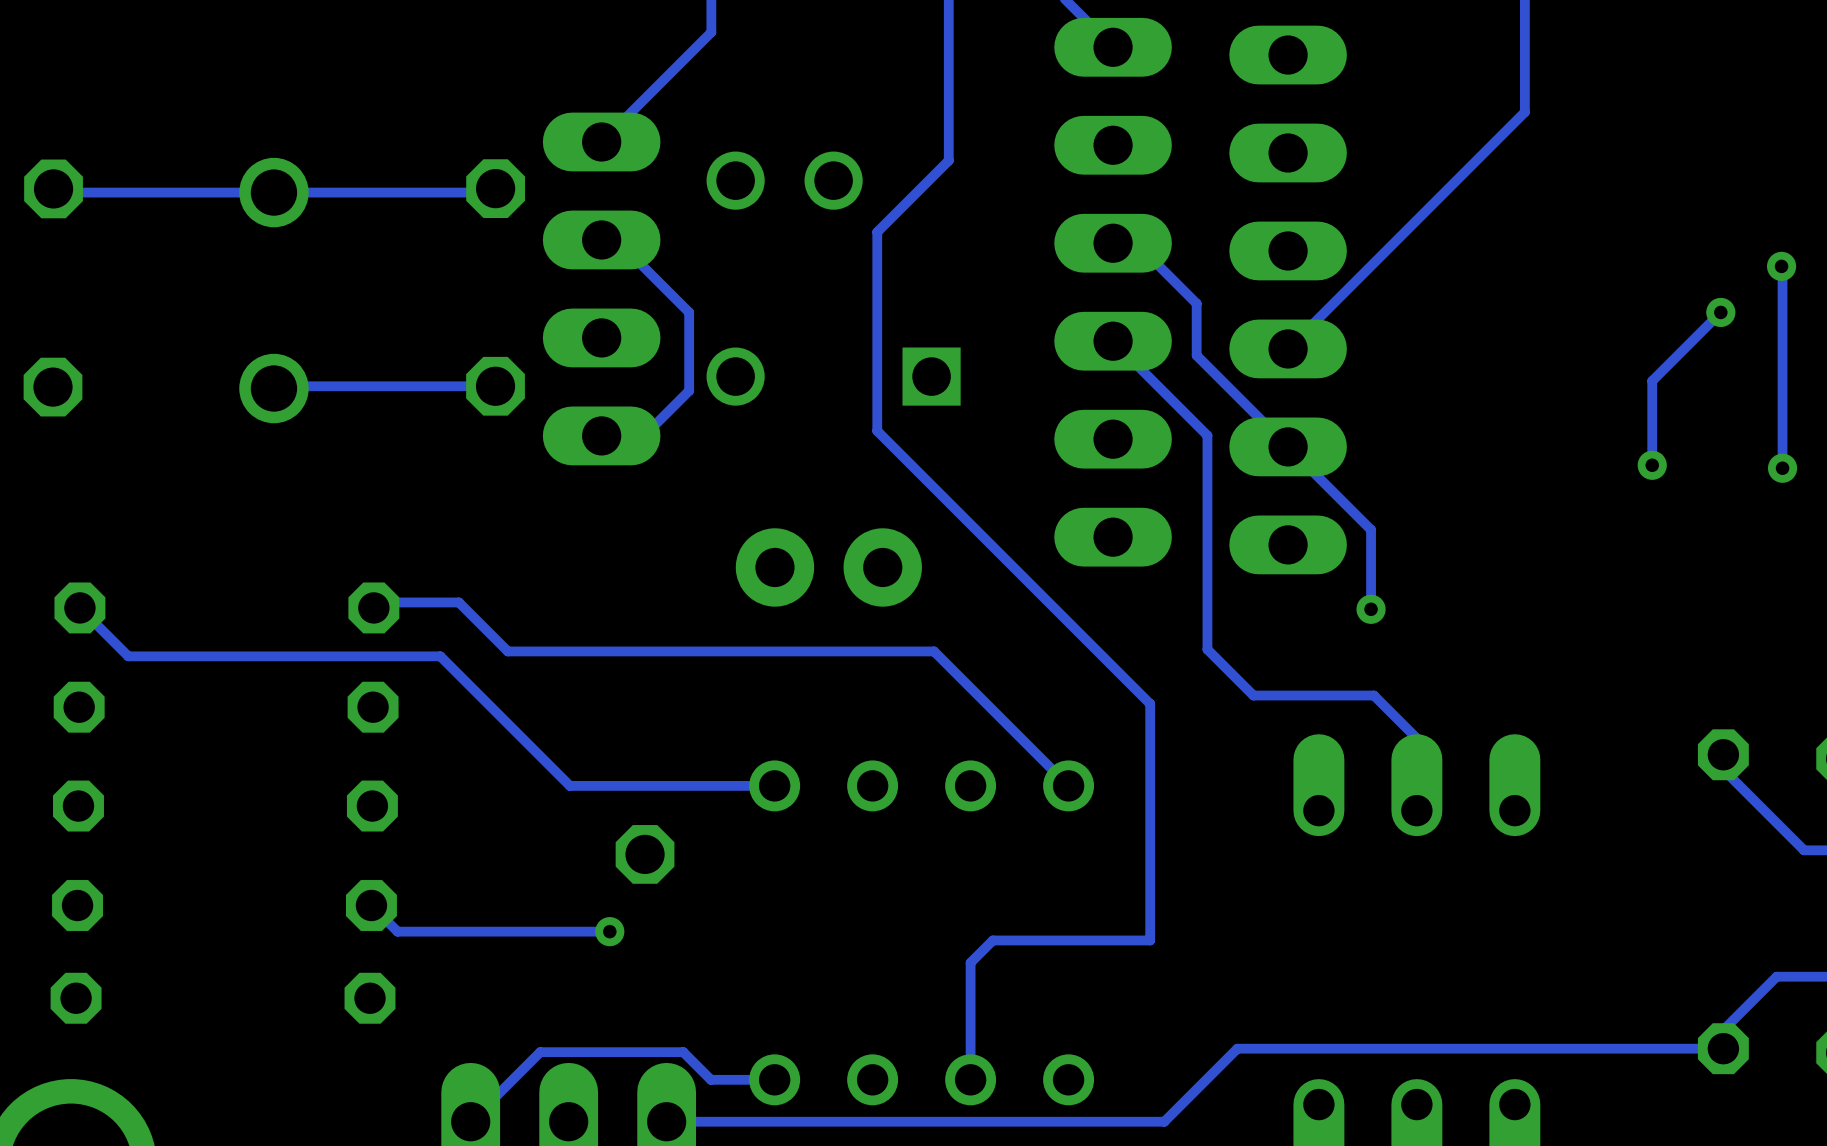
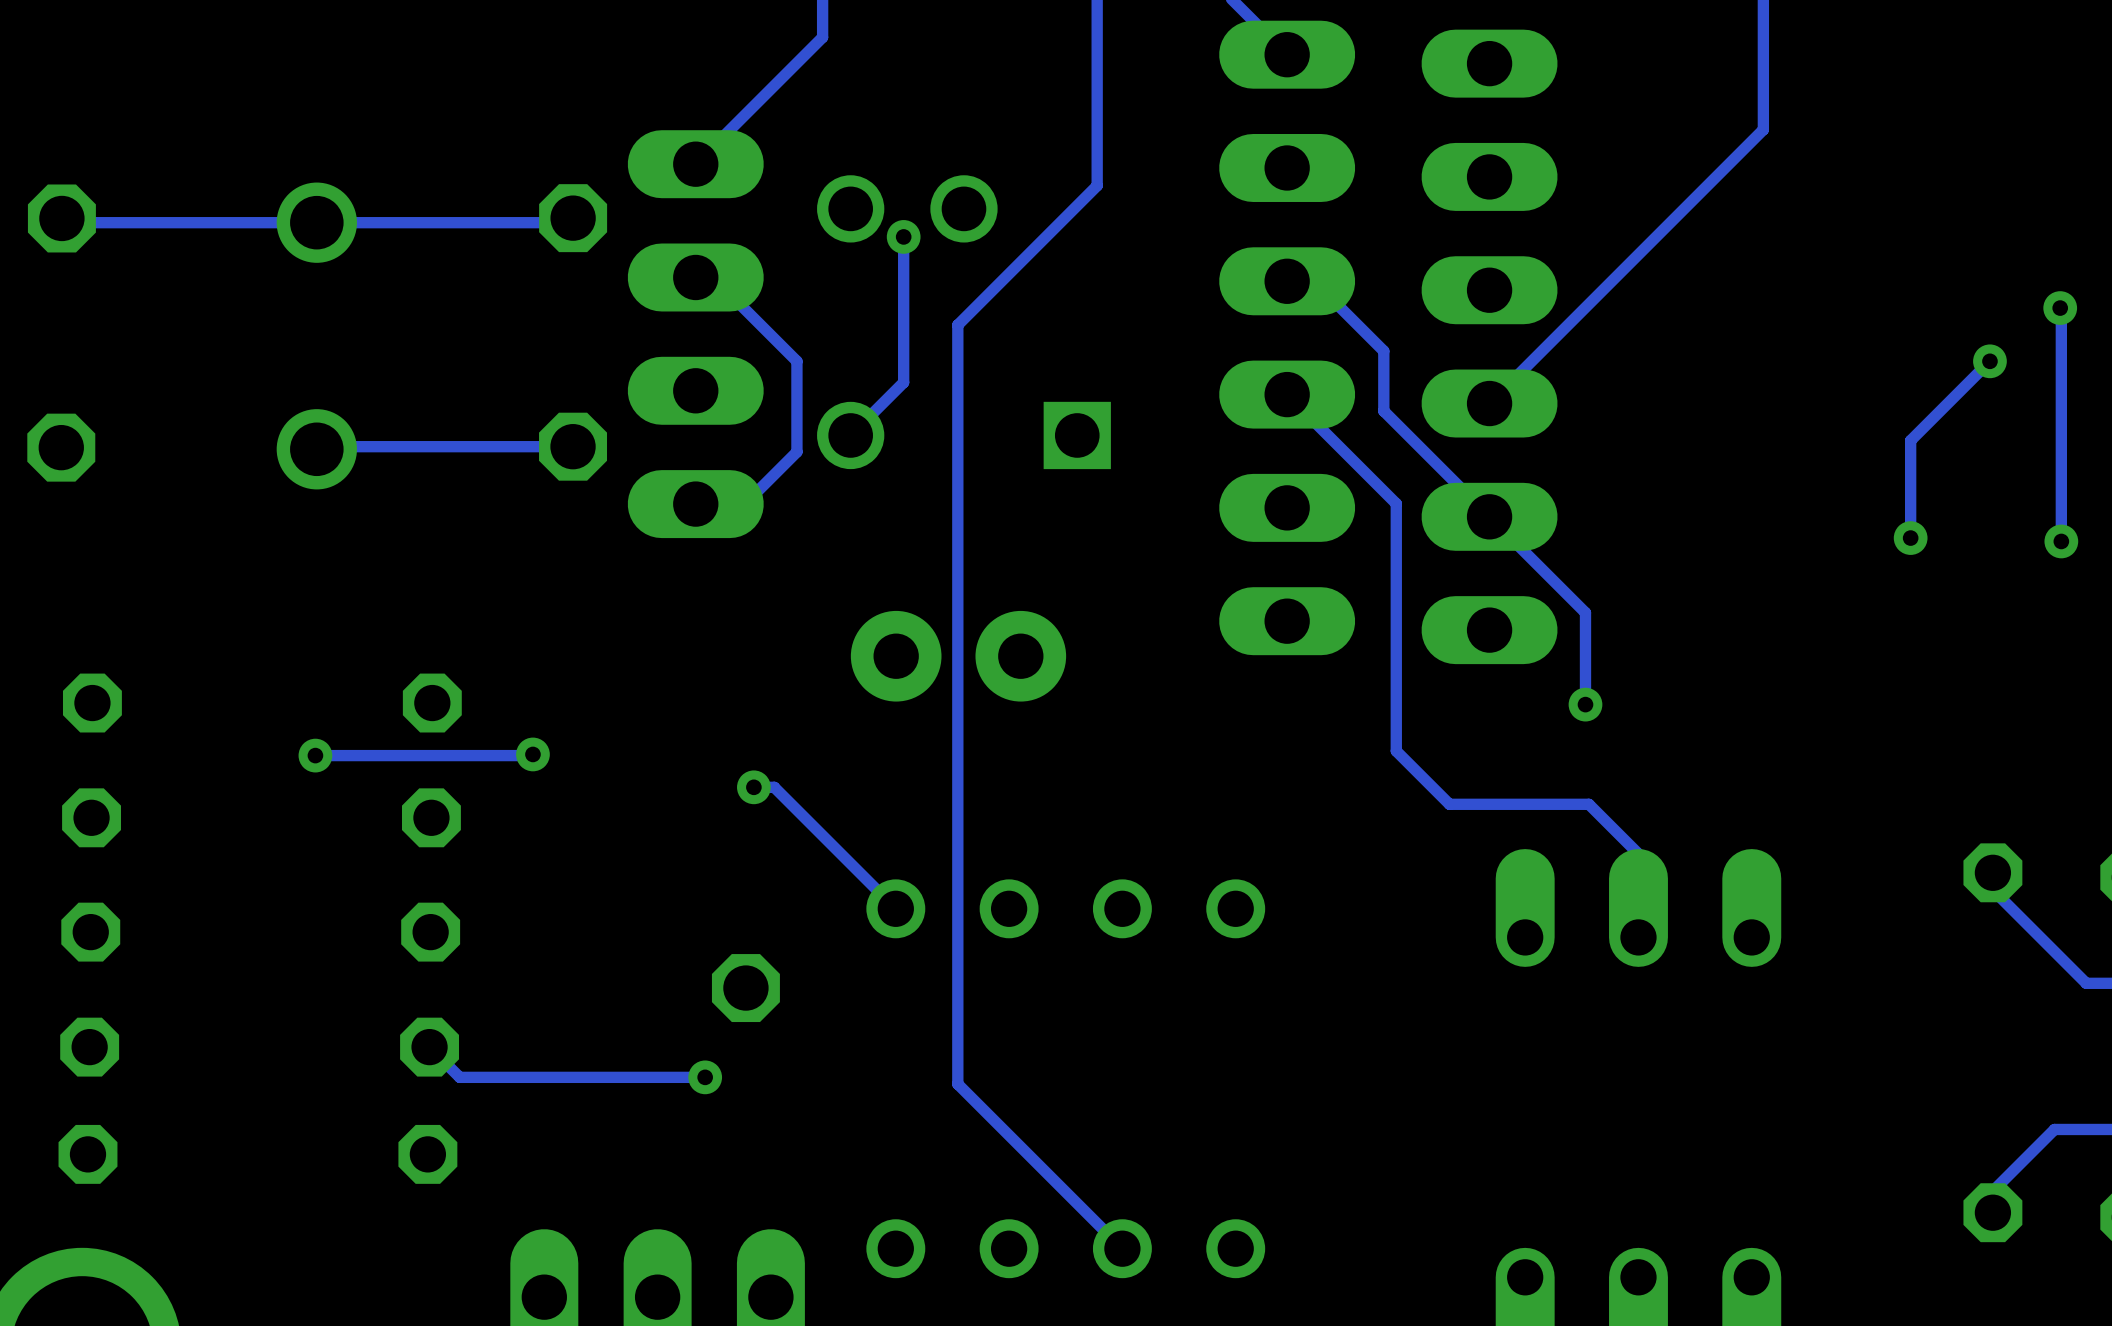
track: none -> (903, 236) (903, 382) (850, 435)
via: none -> (903, 236)
track: (877, 232) (877, 430) (1150, 703) (1150, 940) (992, 940) (970, 962) (970, 1079) -> (1014, 268) (957, 325) (957, 1084) (1122, 1248)
track: (79, 607) (128, 656) (440, 656) (569, 785) (774, 785) -> (753, 787) (774, 787) (895, 908)
track: (373, 607) (379, 602) (458, 602) (507, 651) (934, 651) (1068, 785) -> none
track: none -> (532, 754) (315, 755)
via: none -> (532, 754)
via: none -> (315, 755)
via: none -> (753, 787)
track: (1723, 1048) (1237, 1048) (1164, 1121) (666, 1121) -> none
track: (774, 1079) (710, 1079) (683, 1052) (540, 1052) (470, 1121) -> none

